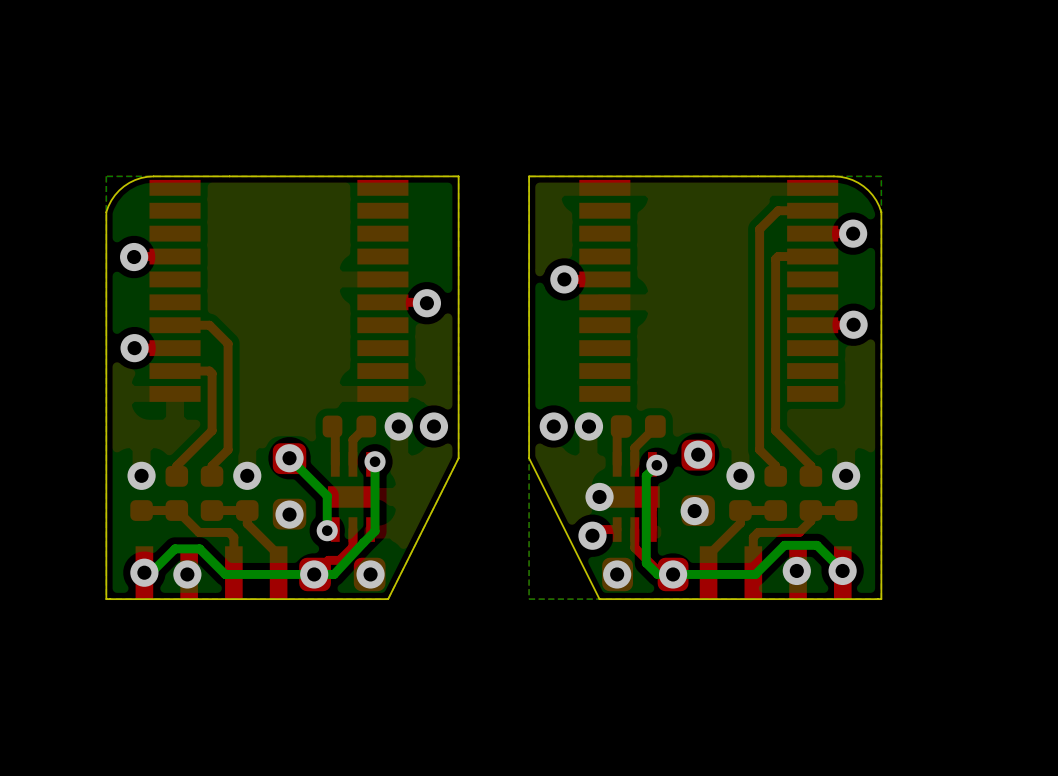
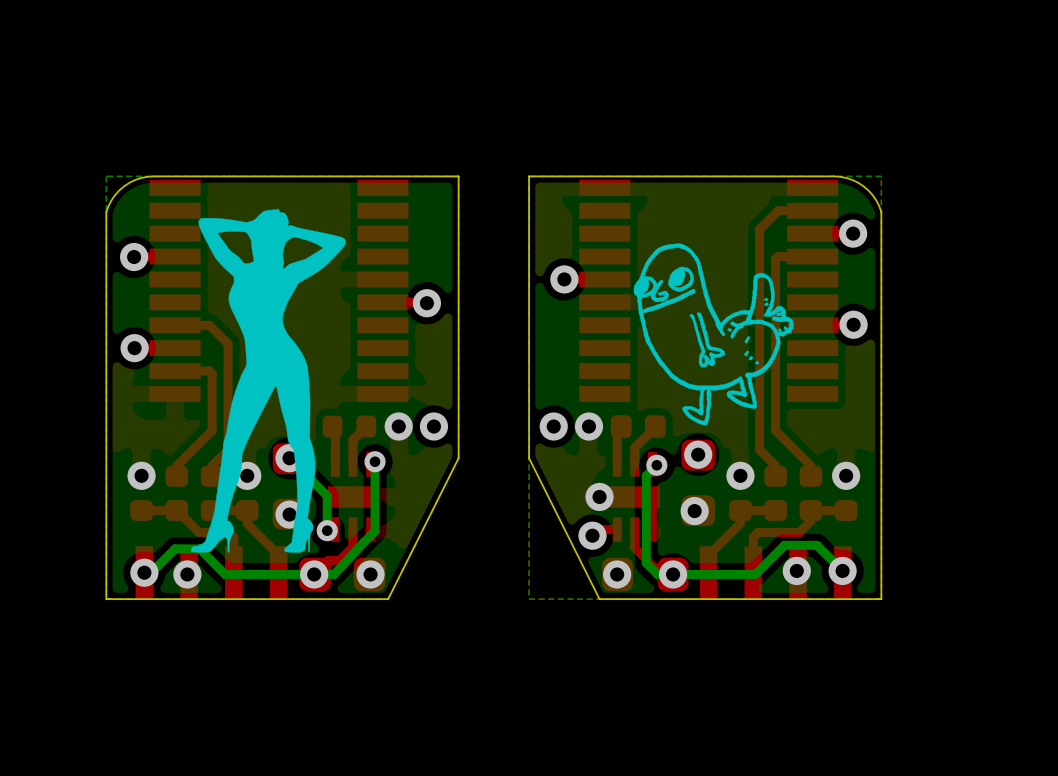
drawing: none -> [191, 209, 346, 553]
drawing: none -> [633, 243, 794, 426]

